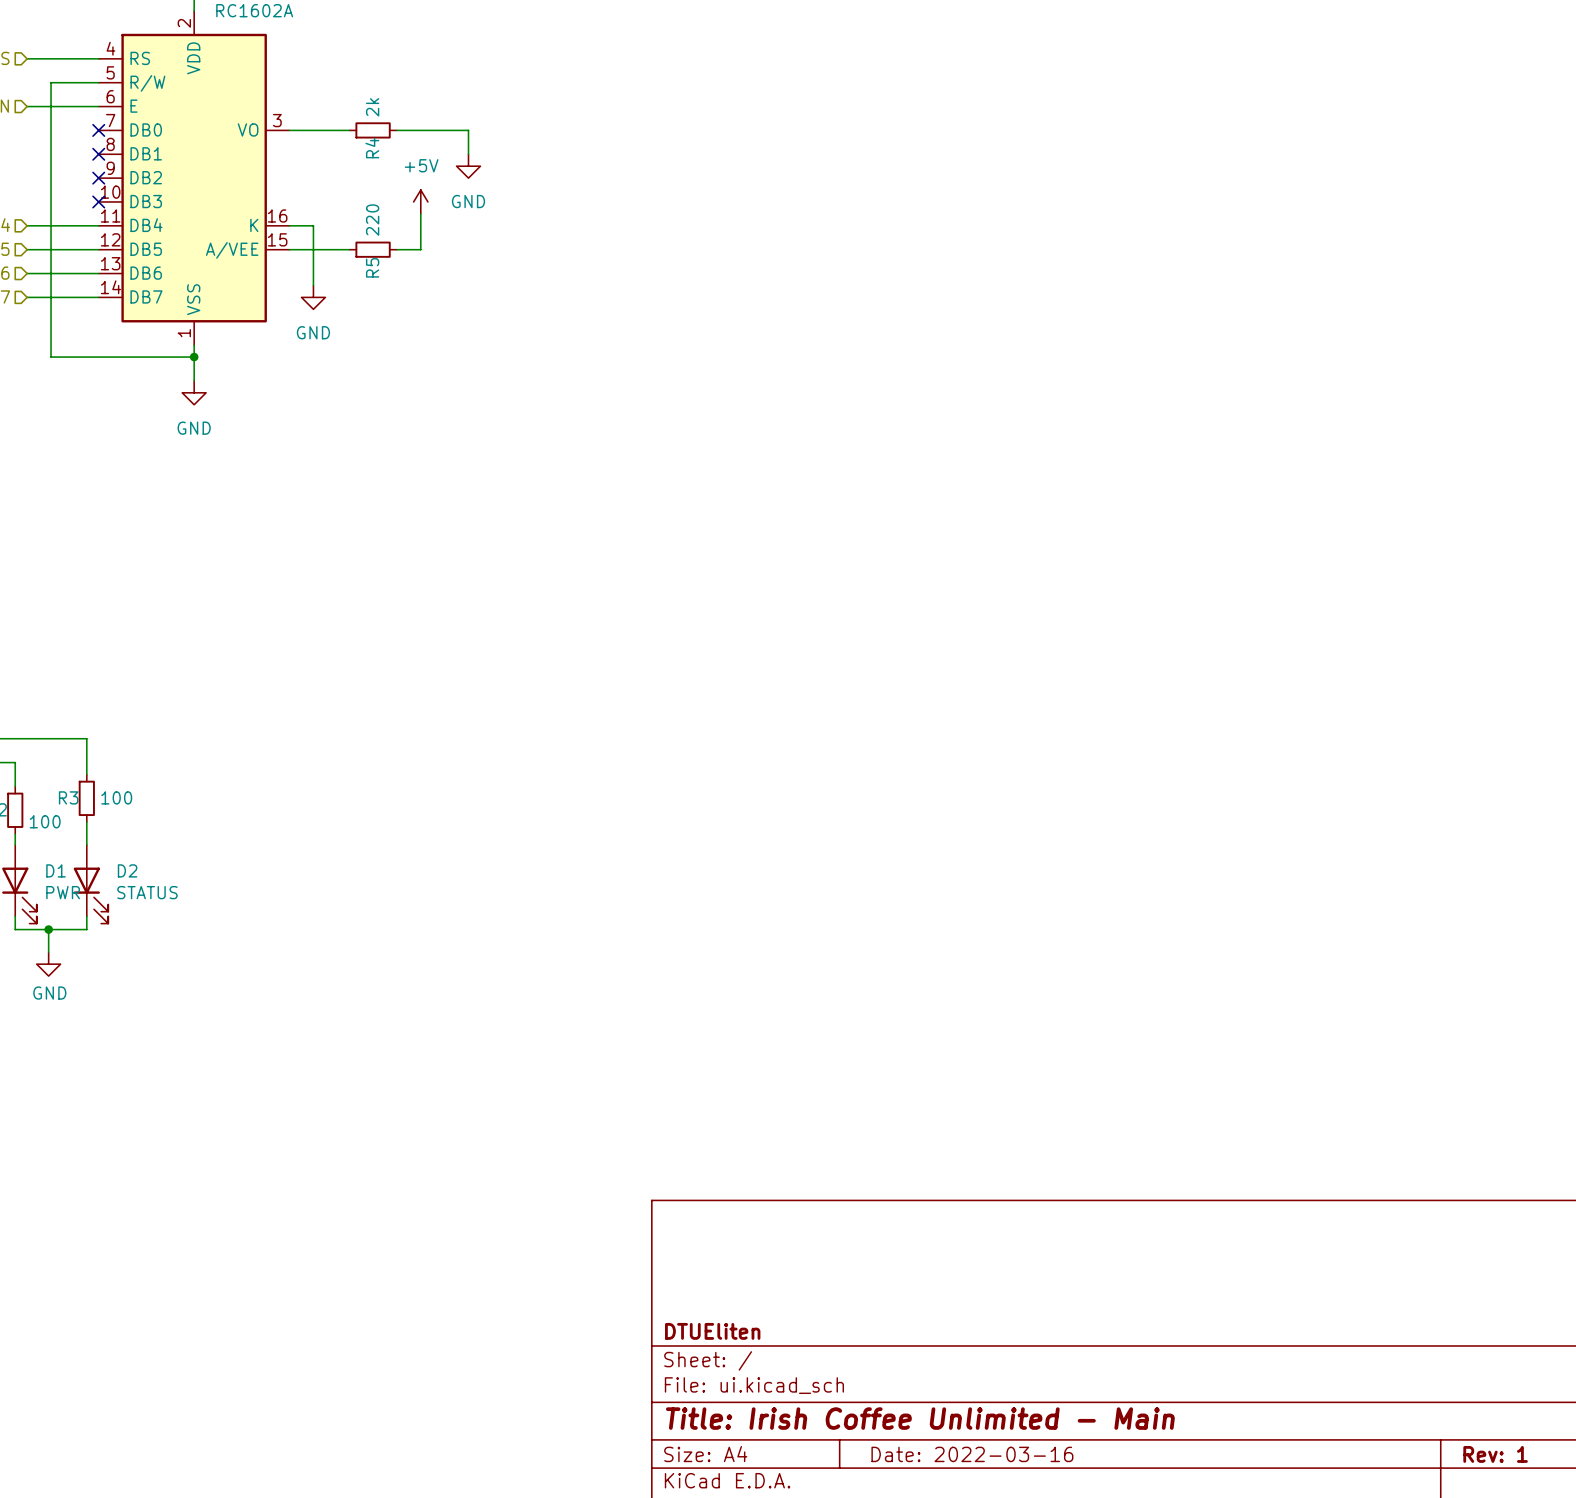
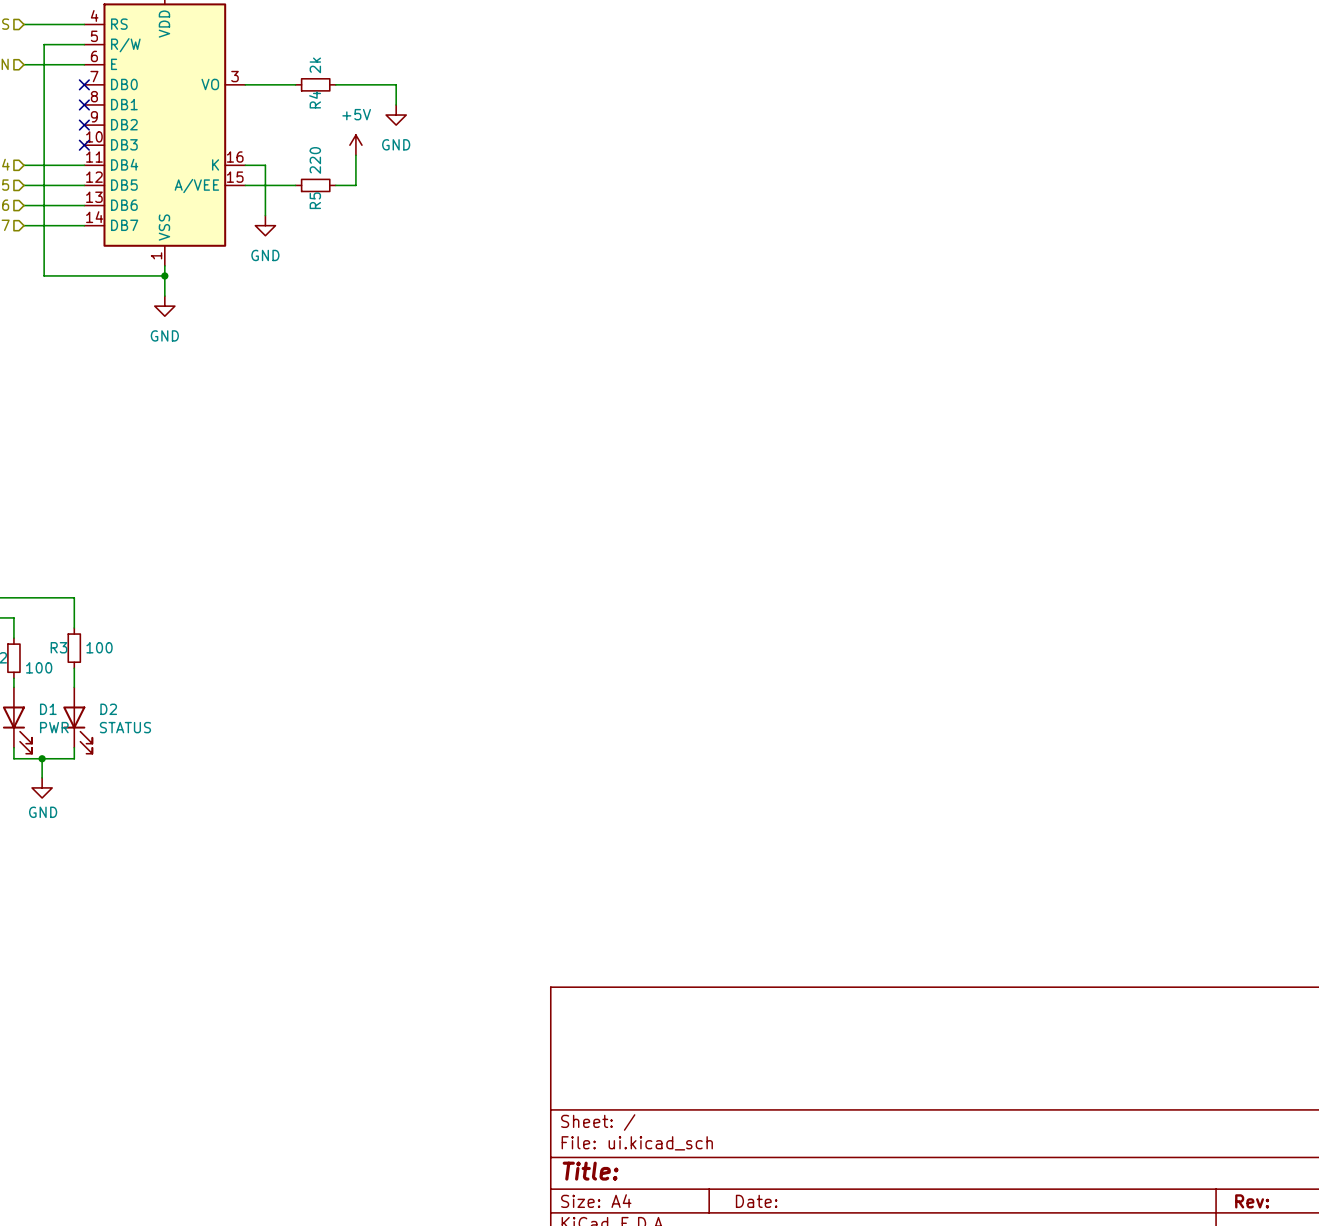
title block: DTUEliten (712, 1331) -> none
title block: Title: Irish Coffee Unlimited - Main (920, 1418) -> Title: (590, 1171)
title block: Date: 2022-03-16 (972, 1454) -> Date: (756, 1201)
title block: Rev: 1 (1495, 1454) -> Rev: (1252, 1201)

